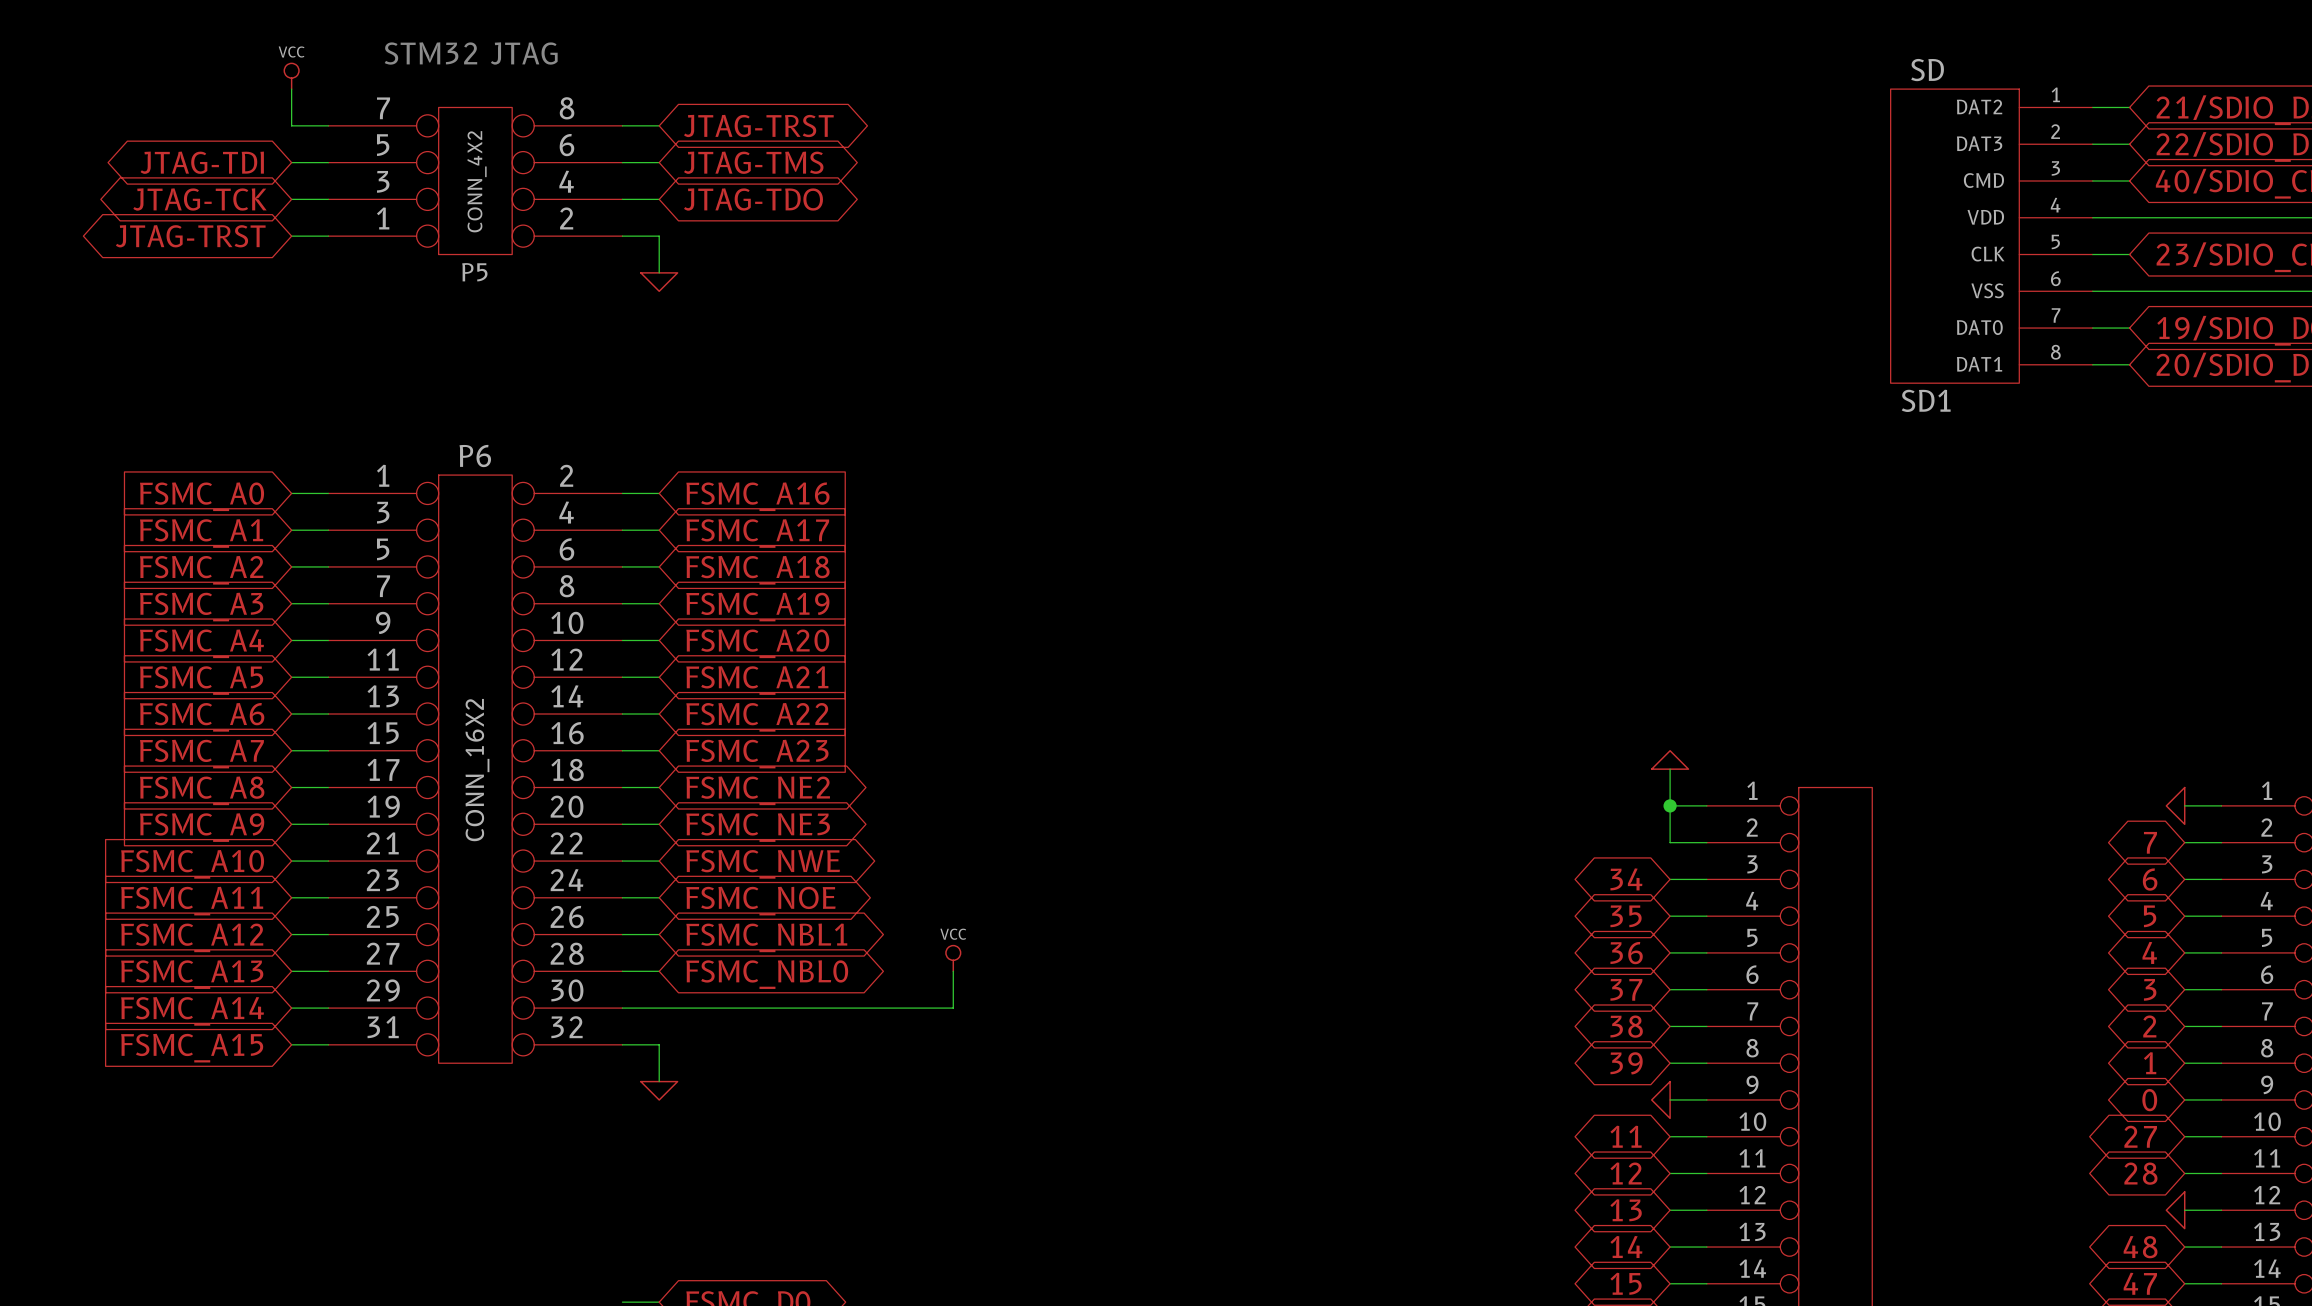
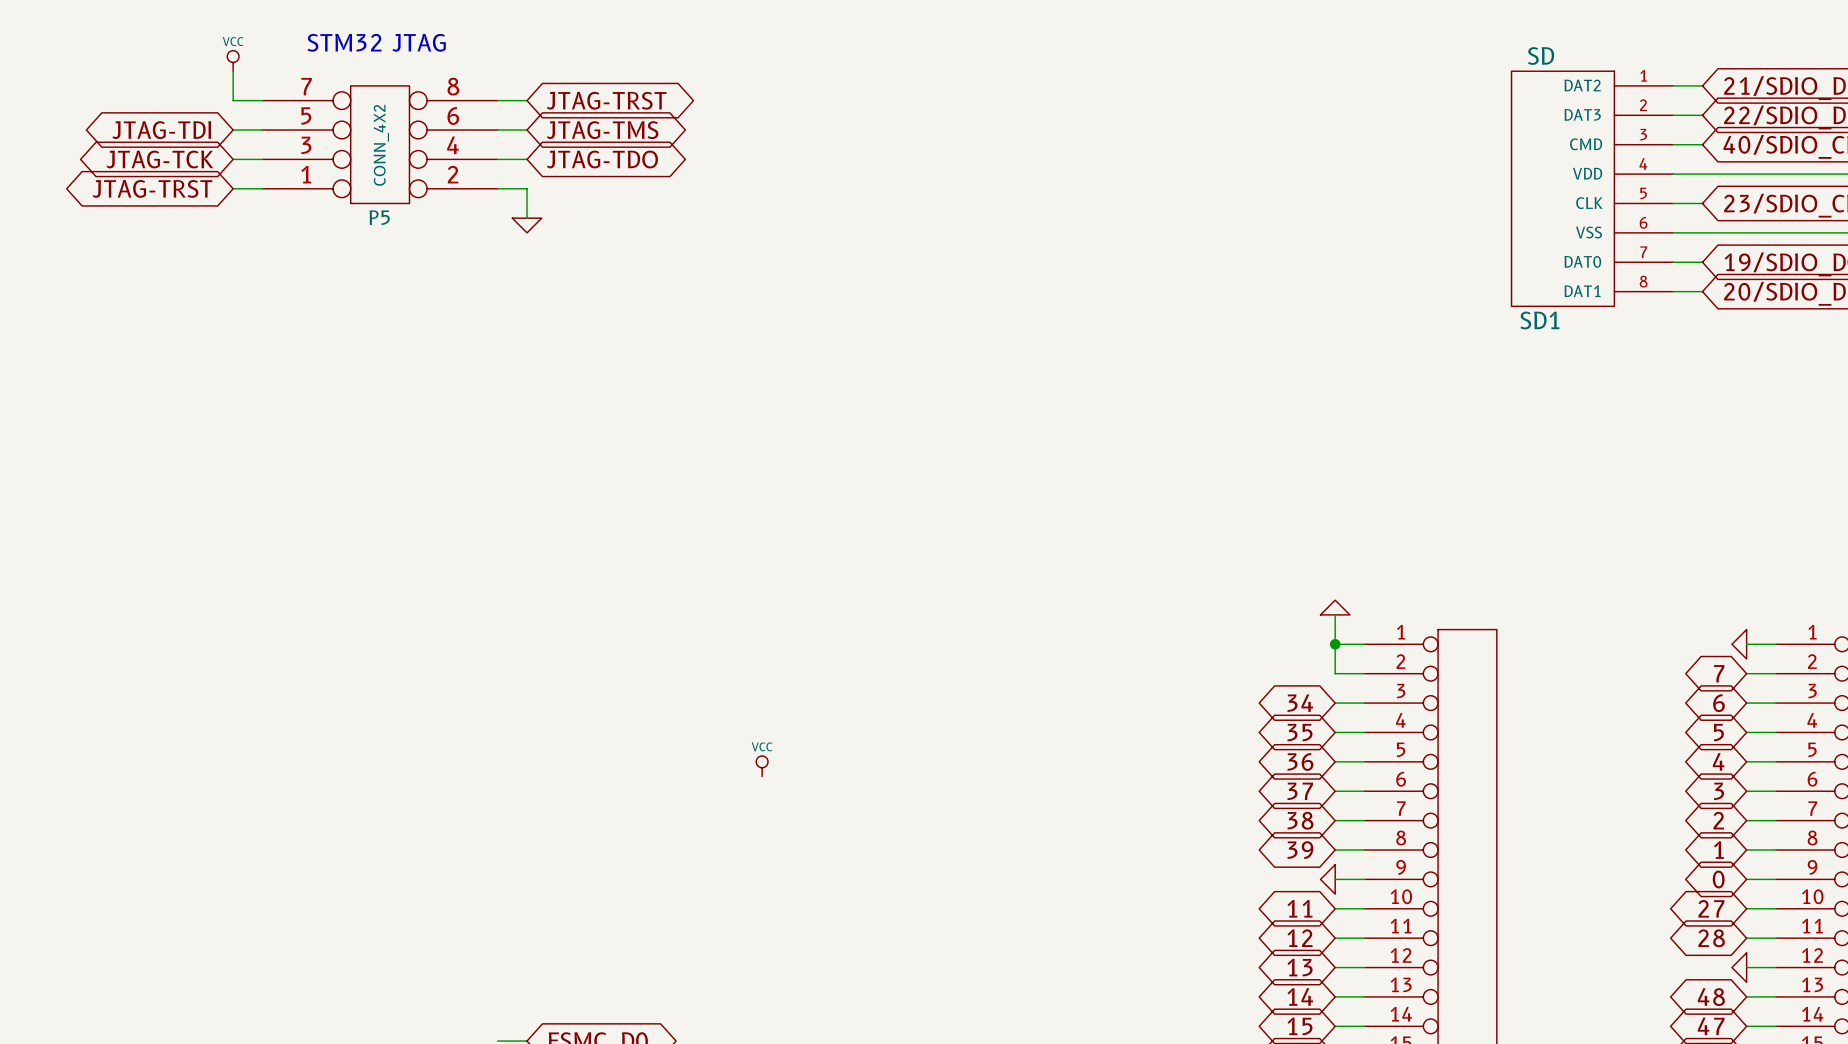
wire: (291, 493) (328, 493) -> none
wire: (622, 493) (659, 493) -> none
global label: FSMC_A0 (202, 496) -> none
global label: FSMC_A16 (757, 496) -> none
wire: (291, 530) (328, 530) -> none
wire: (622, 530) (659, 530) -> none
global label: FSMC_A1 (201, 533) -> none
global label: FSMC_A17 (757, 533) -> none
wire: (291, 566) (328, 566) -> none
wire: (622, 566) (659, 566) -> none
global label: FSMC_A2 (201, 570) -> none
global label: FSMC_A18 (757, 570) -> none
wire: (291, 603) (328, 603) -> none
wire: (622, 603) (659, 603) -> none
global label: FSMC_A3 (201, 607) -> none
global label: FSMC_A19 (757, 607) -> none
wire: (291, 640) (328, 640) -> none
wire: (622, 640) (659, 640) -> none
global label: FSMC_A4 (201, 643) -> none
global label: FSMC_A20 (757, 643) -> none
wire: (291, 677) (328, 677) -> none
wire: (622, 677) (659, 677) -> none
global label: FSMC_A5 (201, 680) -> none
global label: FSMC_A21 (757, 680) -> none
wire: (291, 714) (328, 714) -> none
wire: (622, 714) (659, 714) -> none
global label: FSMC_A6 (202, 717) -> none
global label: FSMC_A22 (757, 717) -> none
wire: (291, 750) (328, 750) -> none
wire: (622, 750) (659, 750) -> none
global label: FSMC_A7 (201, 754) -> none
global label: FSMC_A23 (757, 754) -> none
P6: CONN_16X2 (475, 769) -> none
wire: (291, 787) (328, 787) -> none
wire: (622, 787) (659, 787) -> none
global label: FSMC_A8 (202, 790) -> none
global label: FSMC_NE2 (758, 790) -> none
wire: (291, 824) (328, 824) -> none
wire: (622, 824) (659, 824) -> none
global label: FSMC_A9 (202, 827) -> none
global label: FSMC_NE3 (758, 827) -> none
wire: (291, 861) (328, 861) -> none
wire: (622, 861) (659, 861) -> none
global label: FSMC_A10 (192, 864) -> none
global label: FSMC_NWE (763, 864) -> none
wire: (291, 897) (328, 897) -> none
wire: (622, 897) (659, 897) -> none
global label: FSMC_A11 (192, 901) -> none
global label: FSMC_NOE (760, 901) -> none
wire: (291, 934) (328, 934) -> none
wire: (622, 934) (659, 934) -> none
global label: FSMC_A12 (192, 937) -> none
global label: FSMC_NBL1 (766, 937) -> none
wire: (291, 971) (328, 971) -> none
wire: (622, 971) (659, 971) -> none
wire: (953, 971) (953, 1008) (622, 1008) -> none
global label: FSMC_A13 (192, 974) -> none
global label: FSMC_NBL0 (767, 974) -> none
wire: (291, 1008) (328, 1008) -> none
global label: FSMC_A14 (192, 1011) -> none
wire: (291, 1044) (328, 1044) -> none
wire: (622, 1044) (659, 1044) (659, 1081) -> none
global label: FSMC_A15 (192, 1048) -> none
power symbol: (659, 1090) -> none

